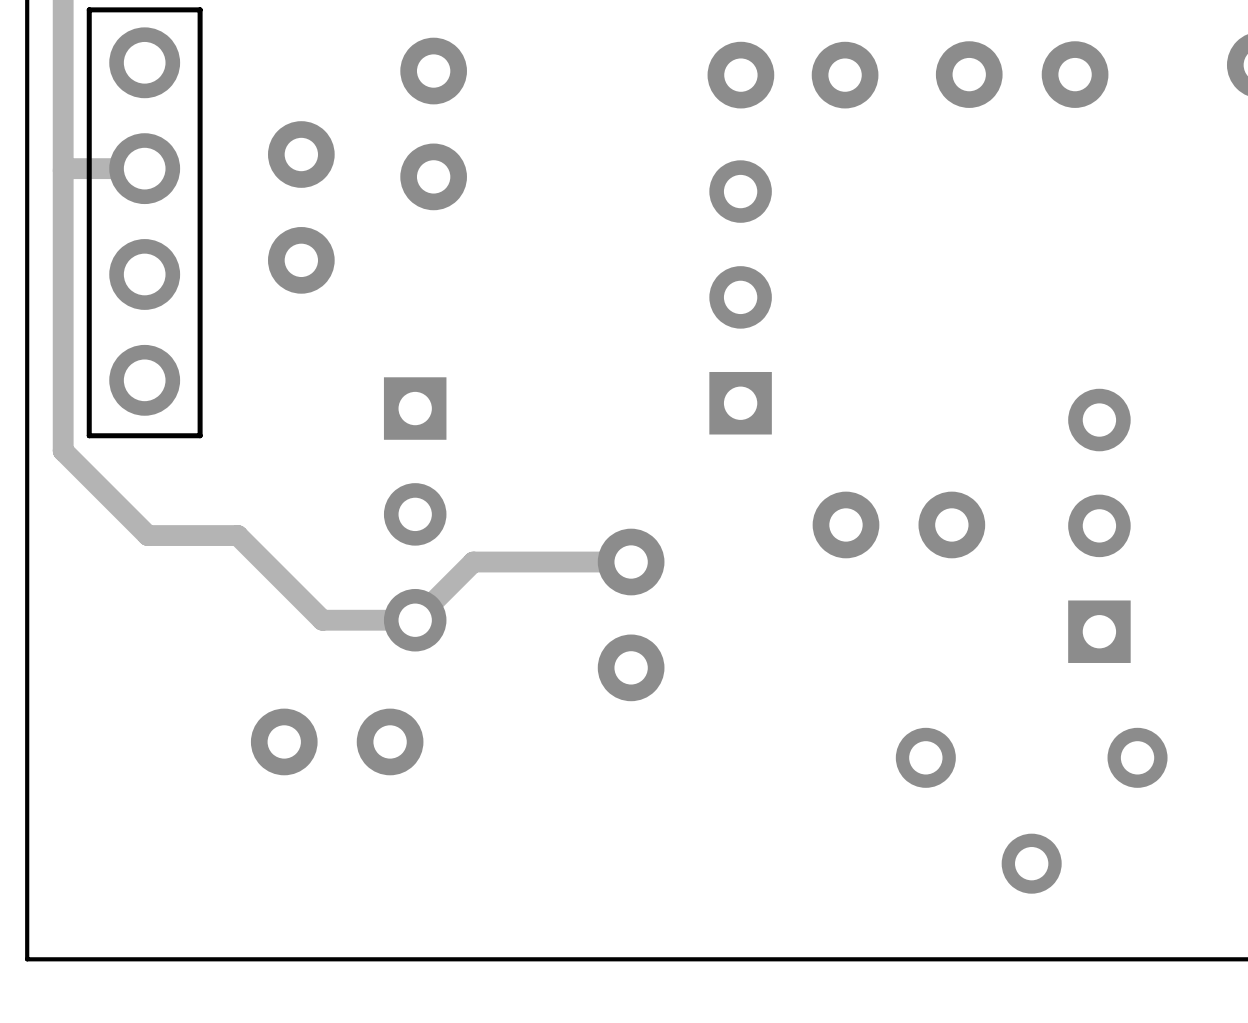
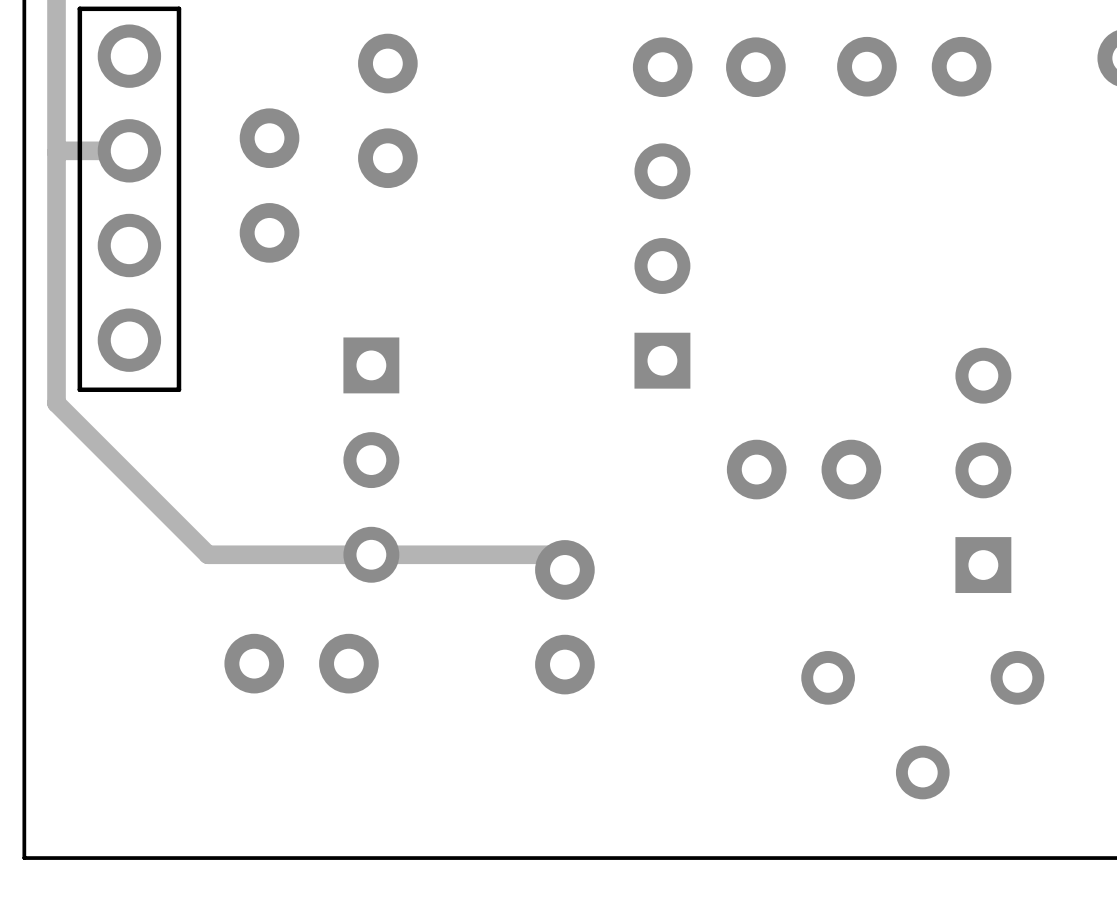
track: (147, 535) (237, 535) (322, 620) -> (132, 479) (207, 554) (288, 554)
track: (629, 560) (631, 562) (473, 562) (415, 620) -> (564, 569) (549, 554) (371, 554)
part position: (631, 614) -> (564, 617)

